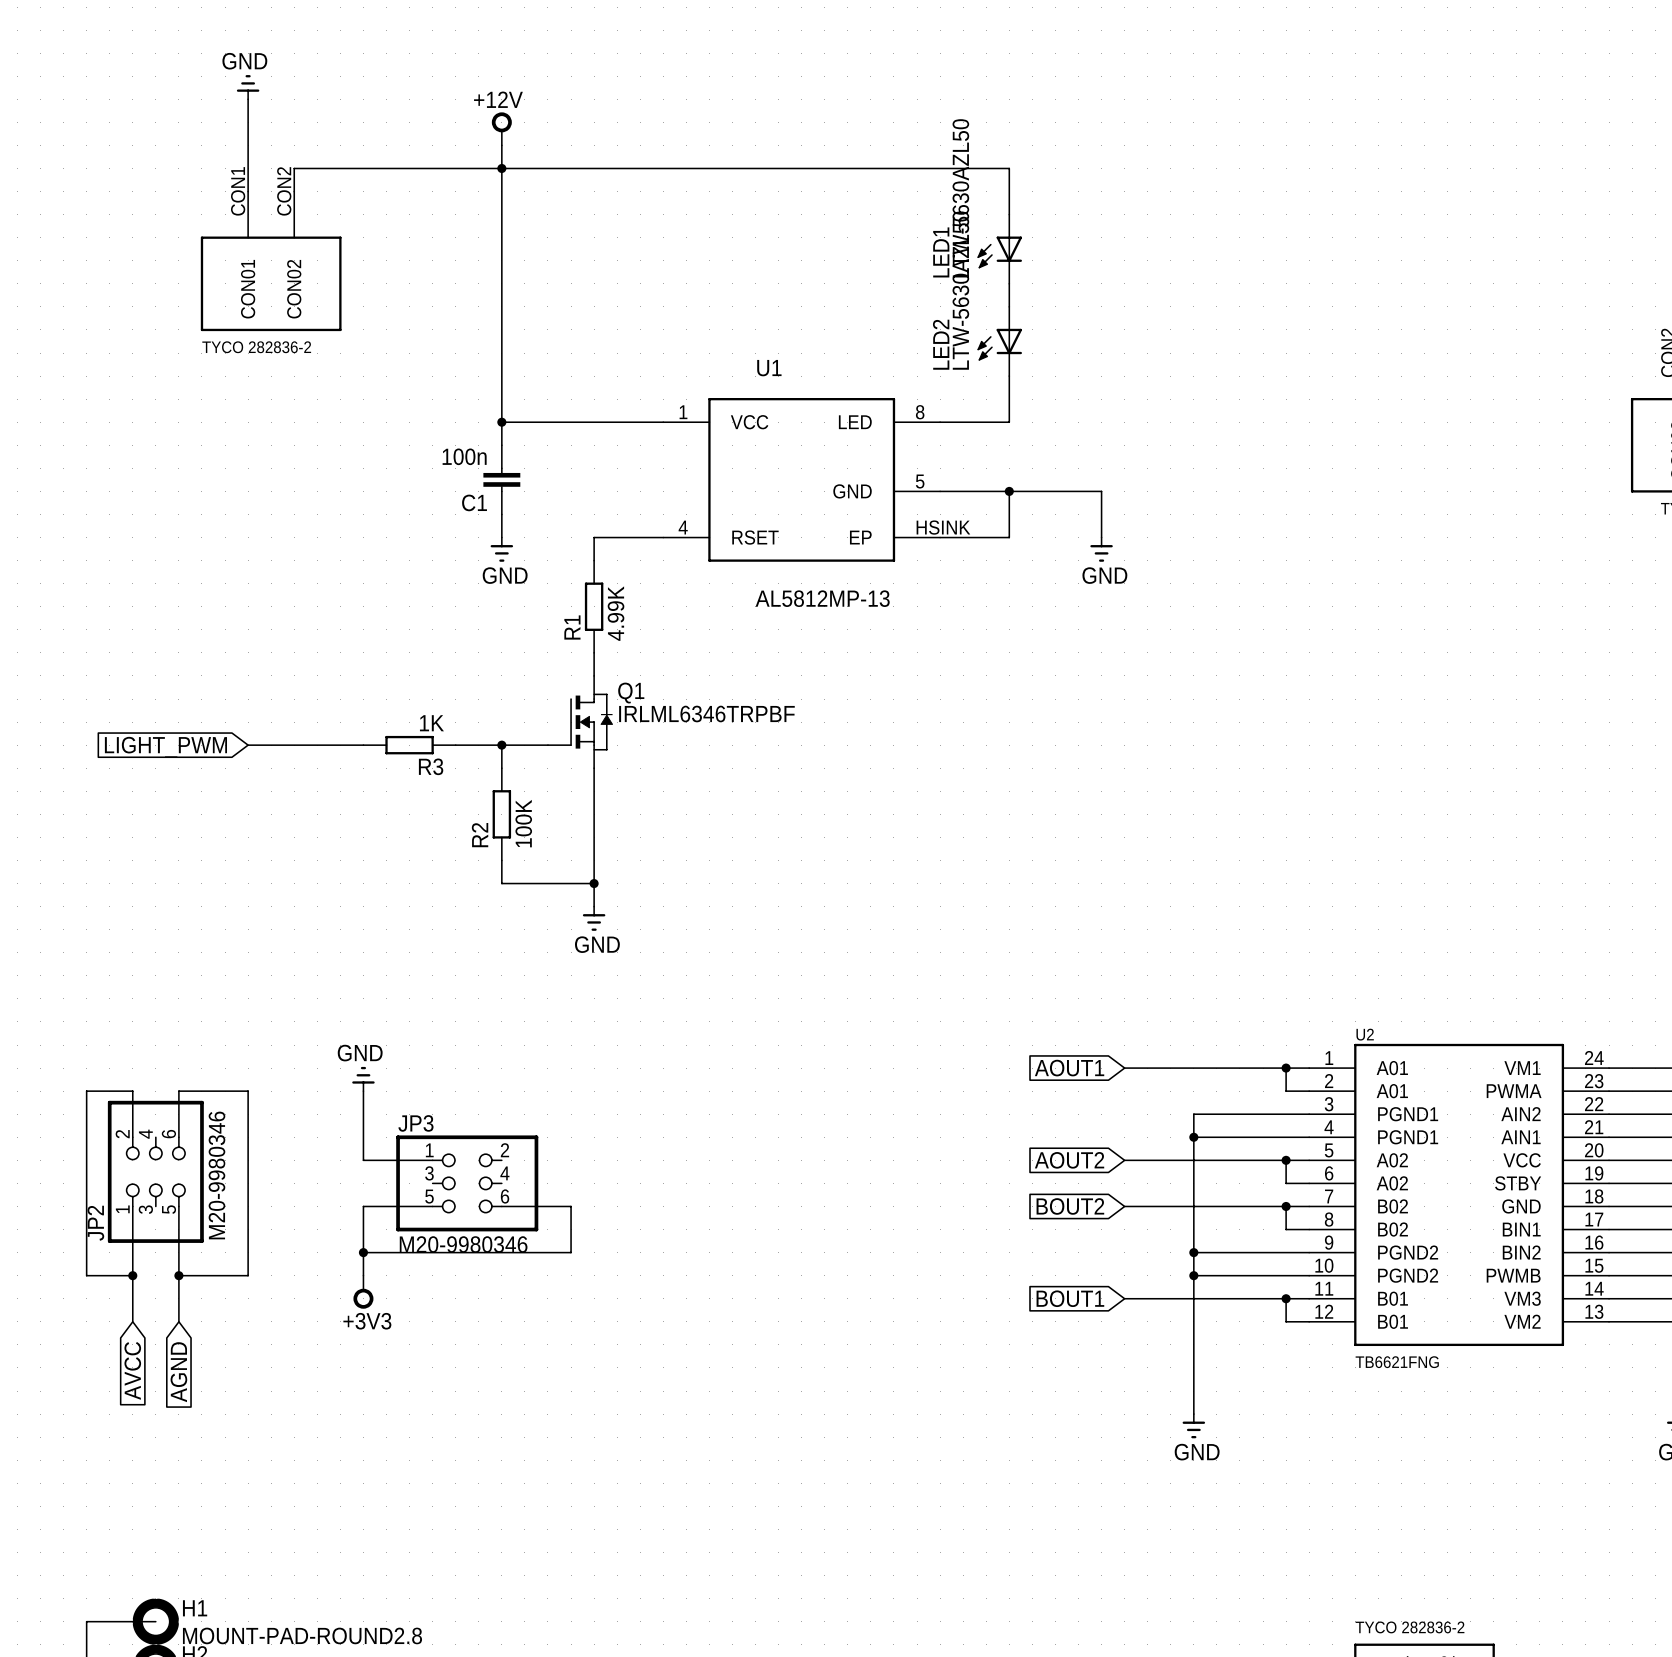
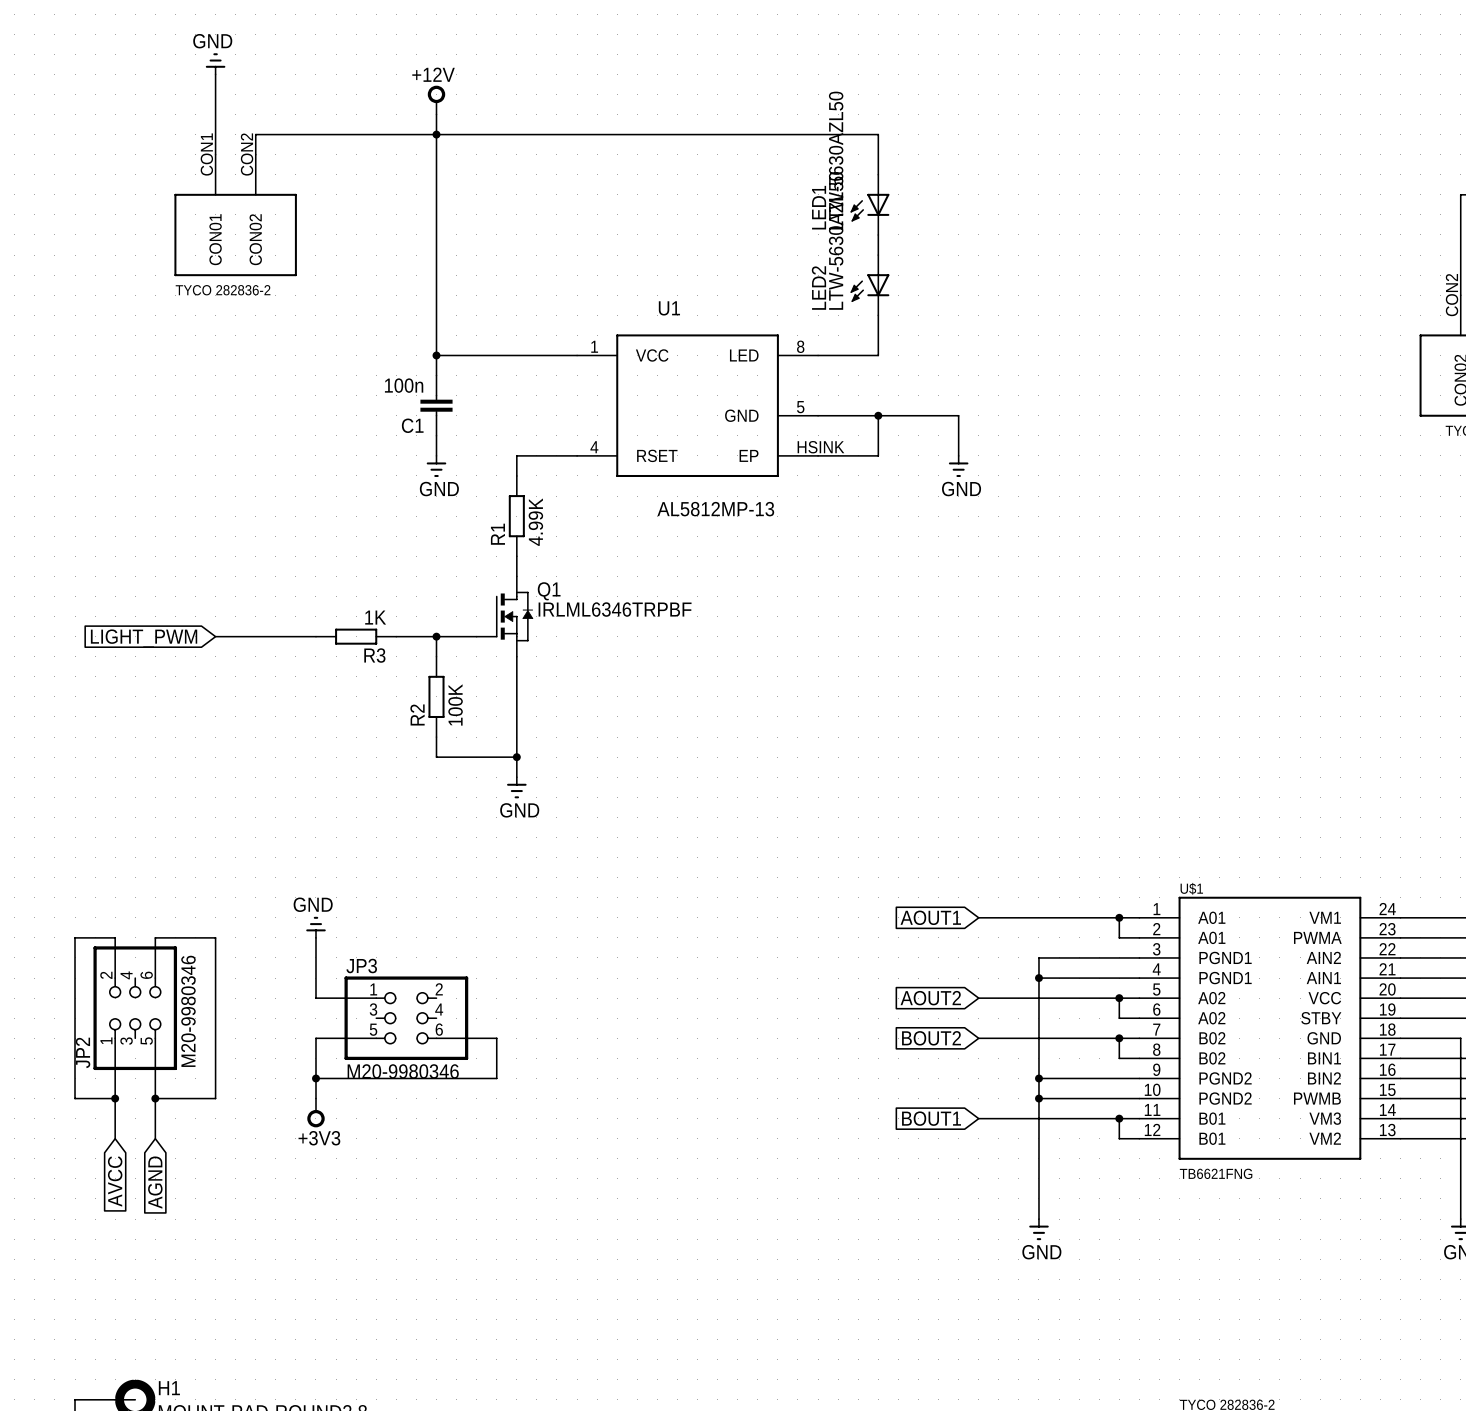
U2 name: U2 (1365, 1034) -> U$1 (1191, 888)

